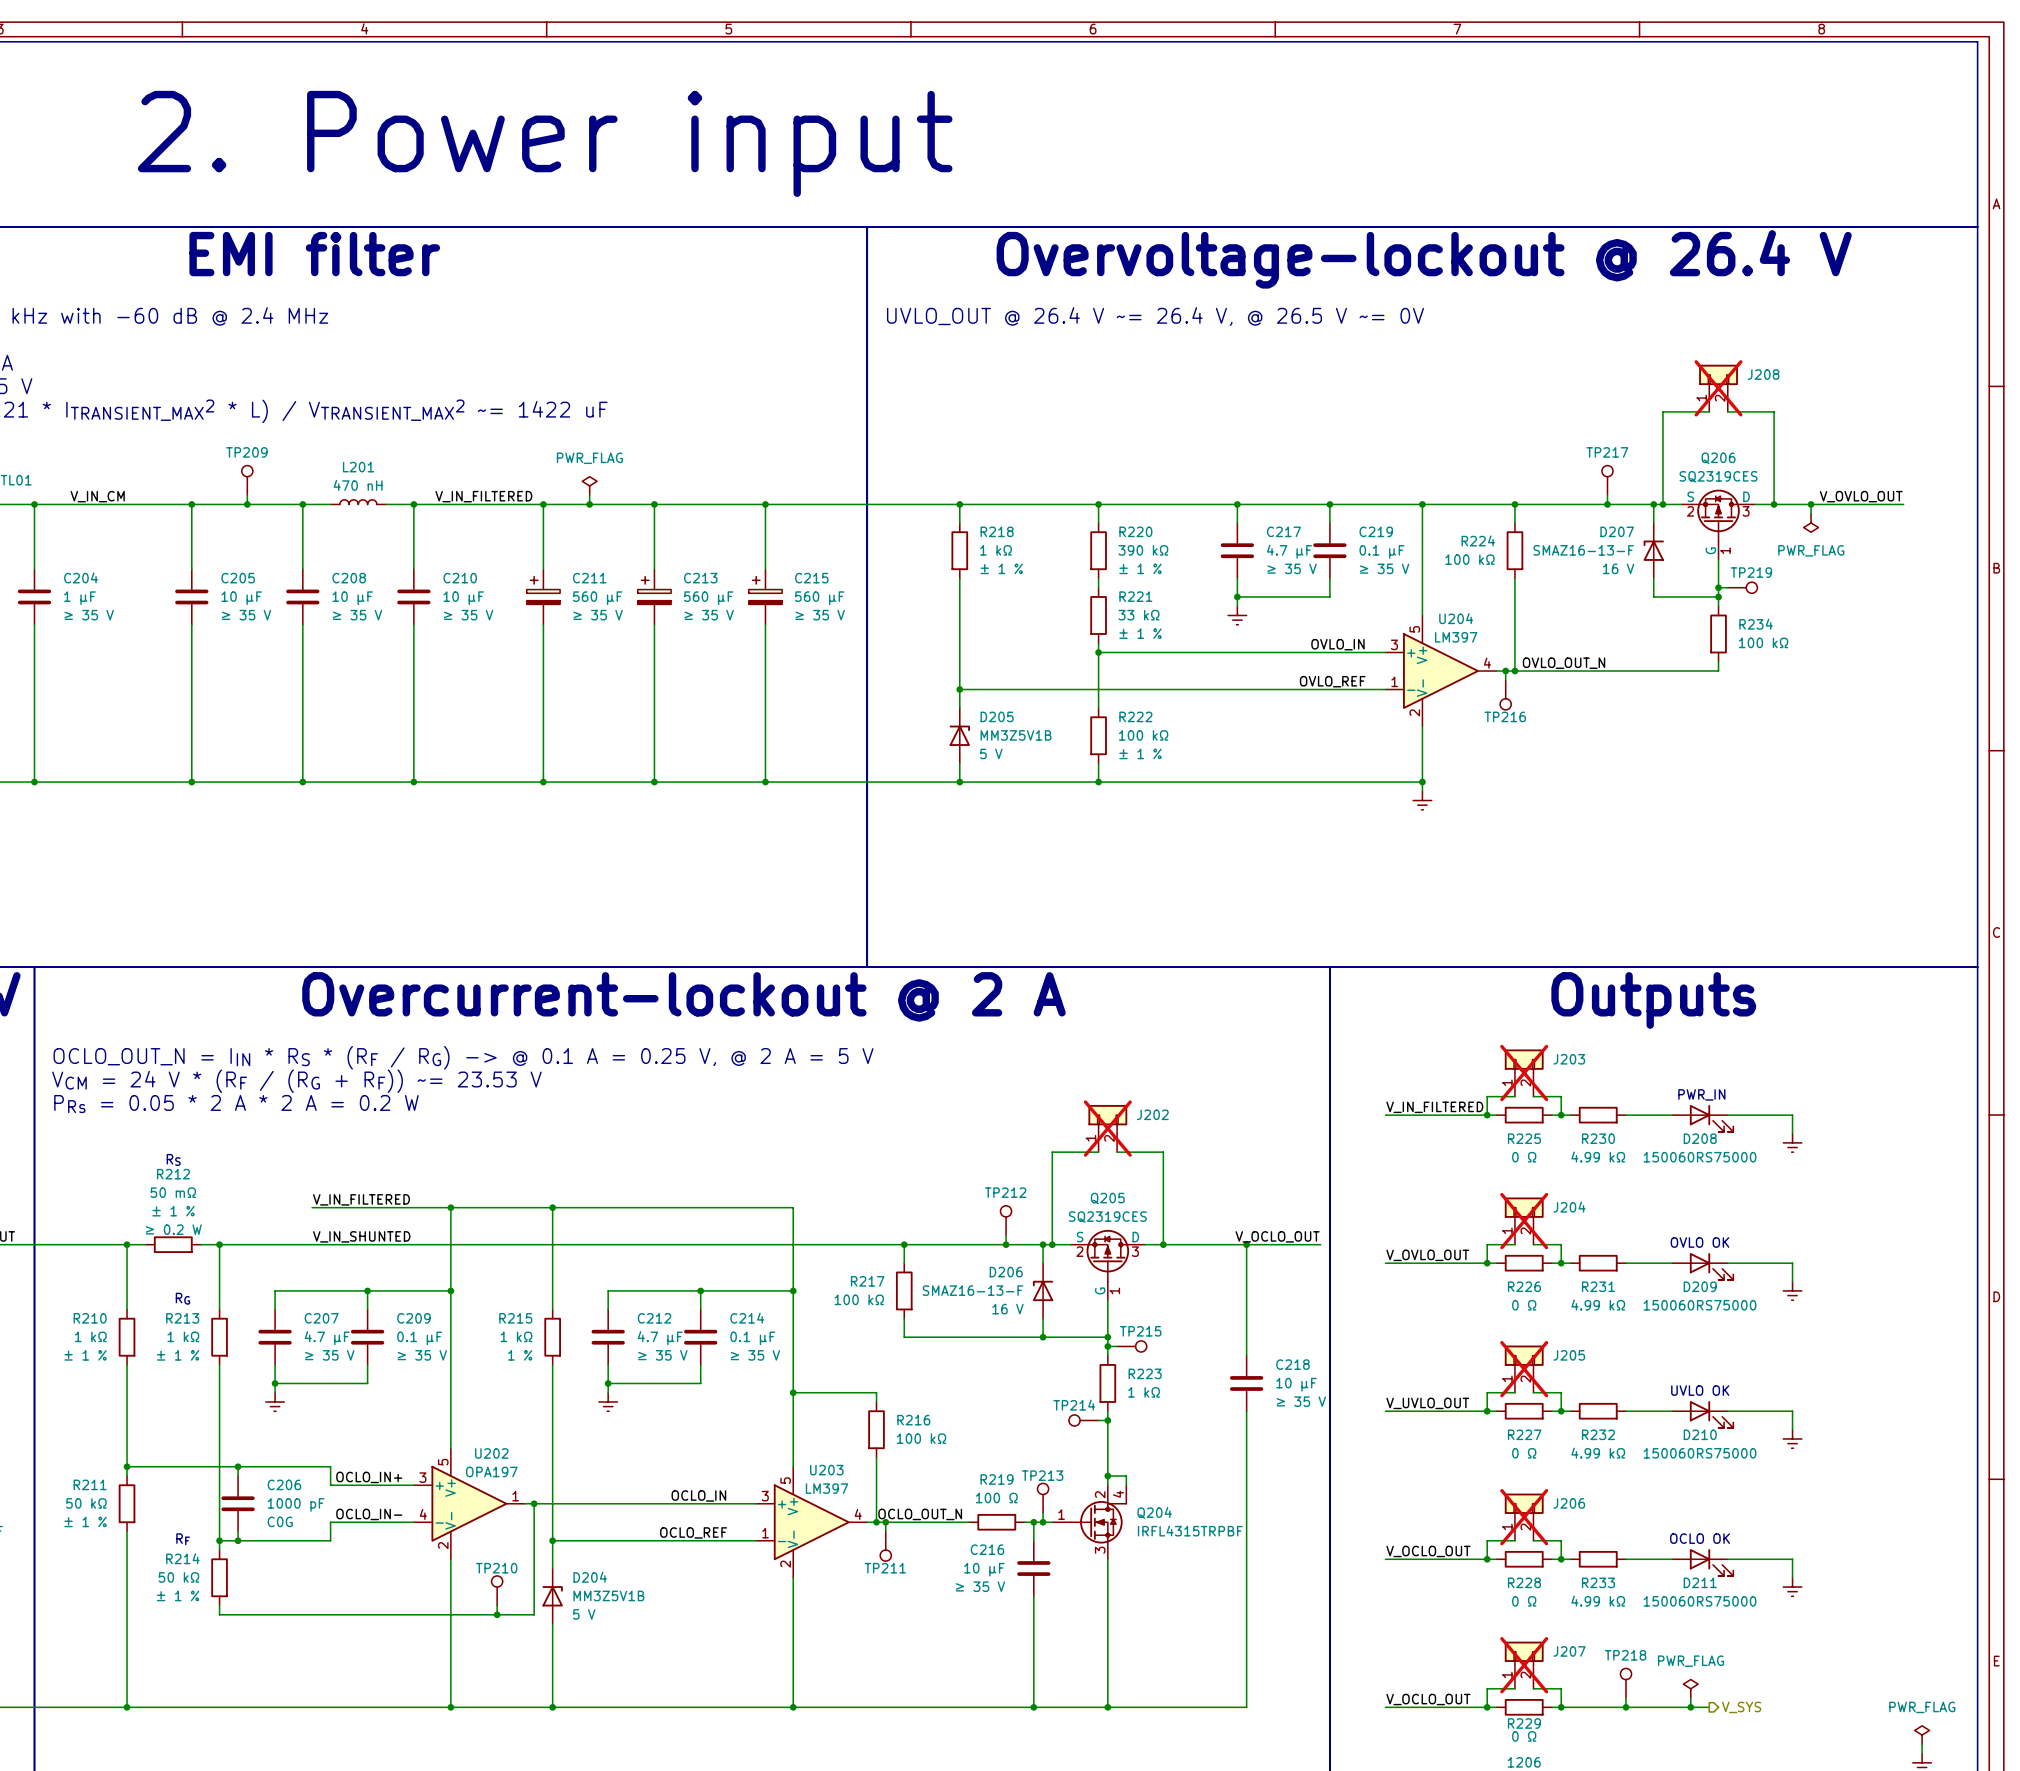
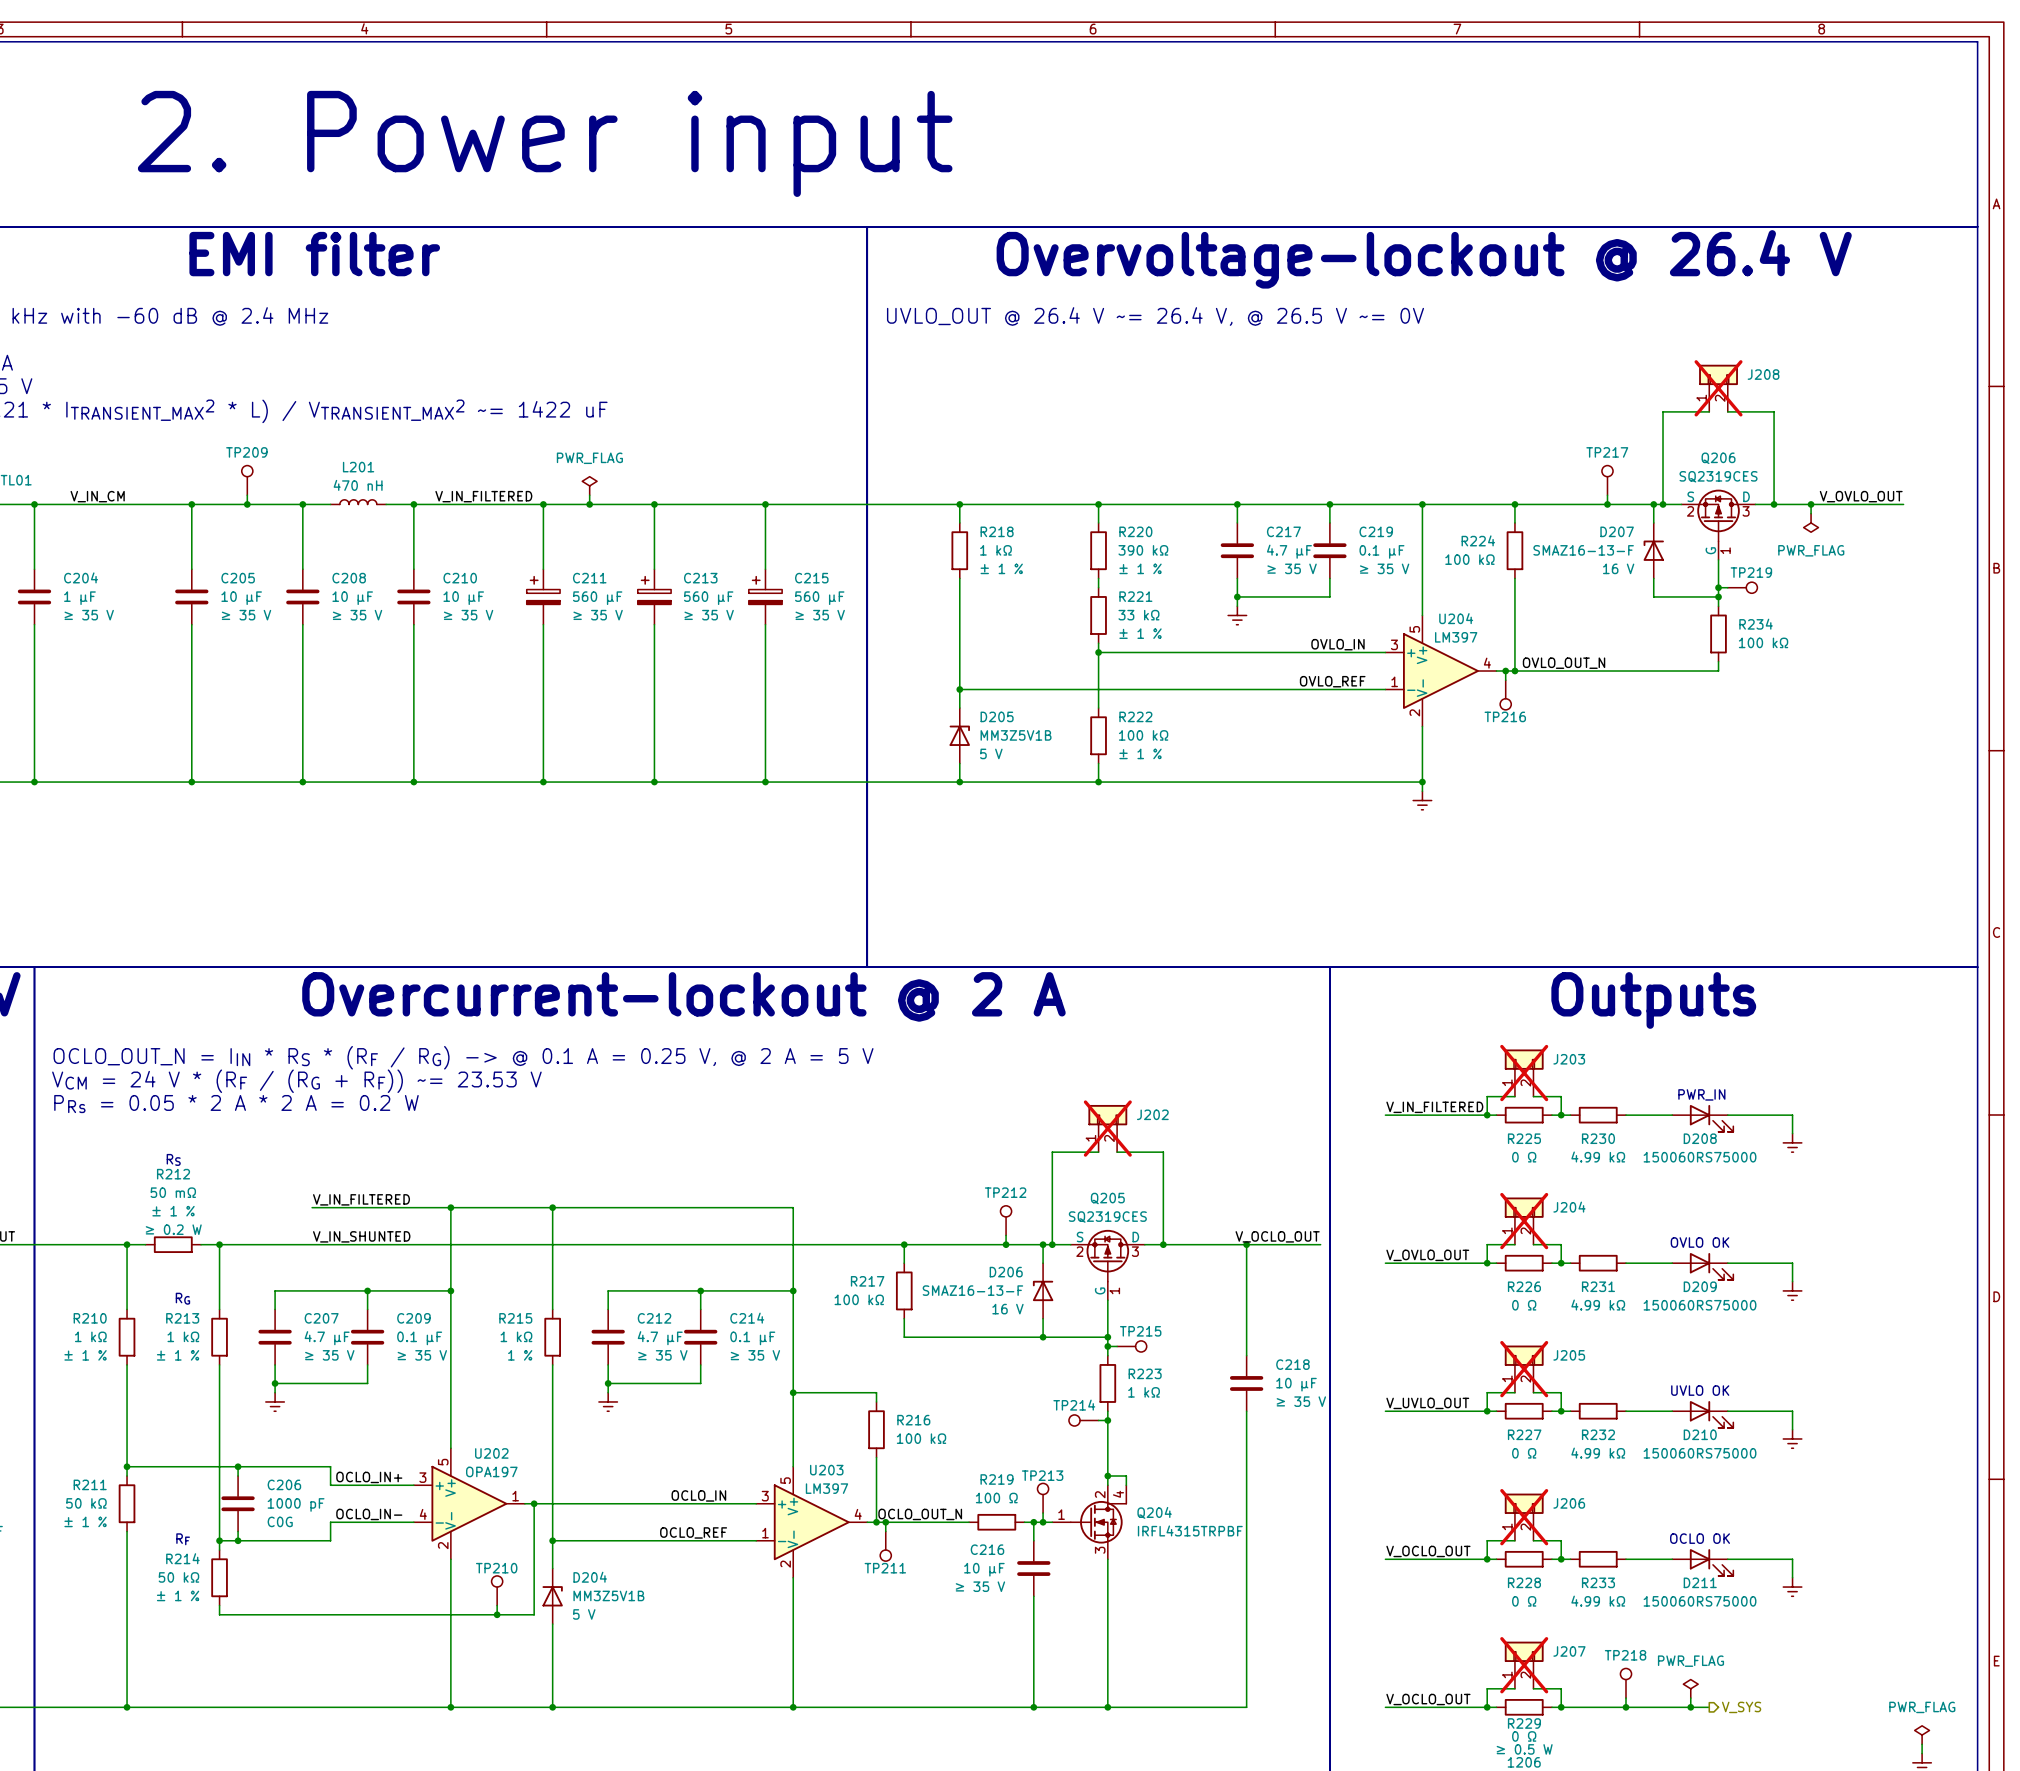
R229 text: none -> ≥ 0.5 W (1524, 1749)

